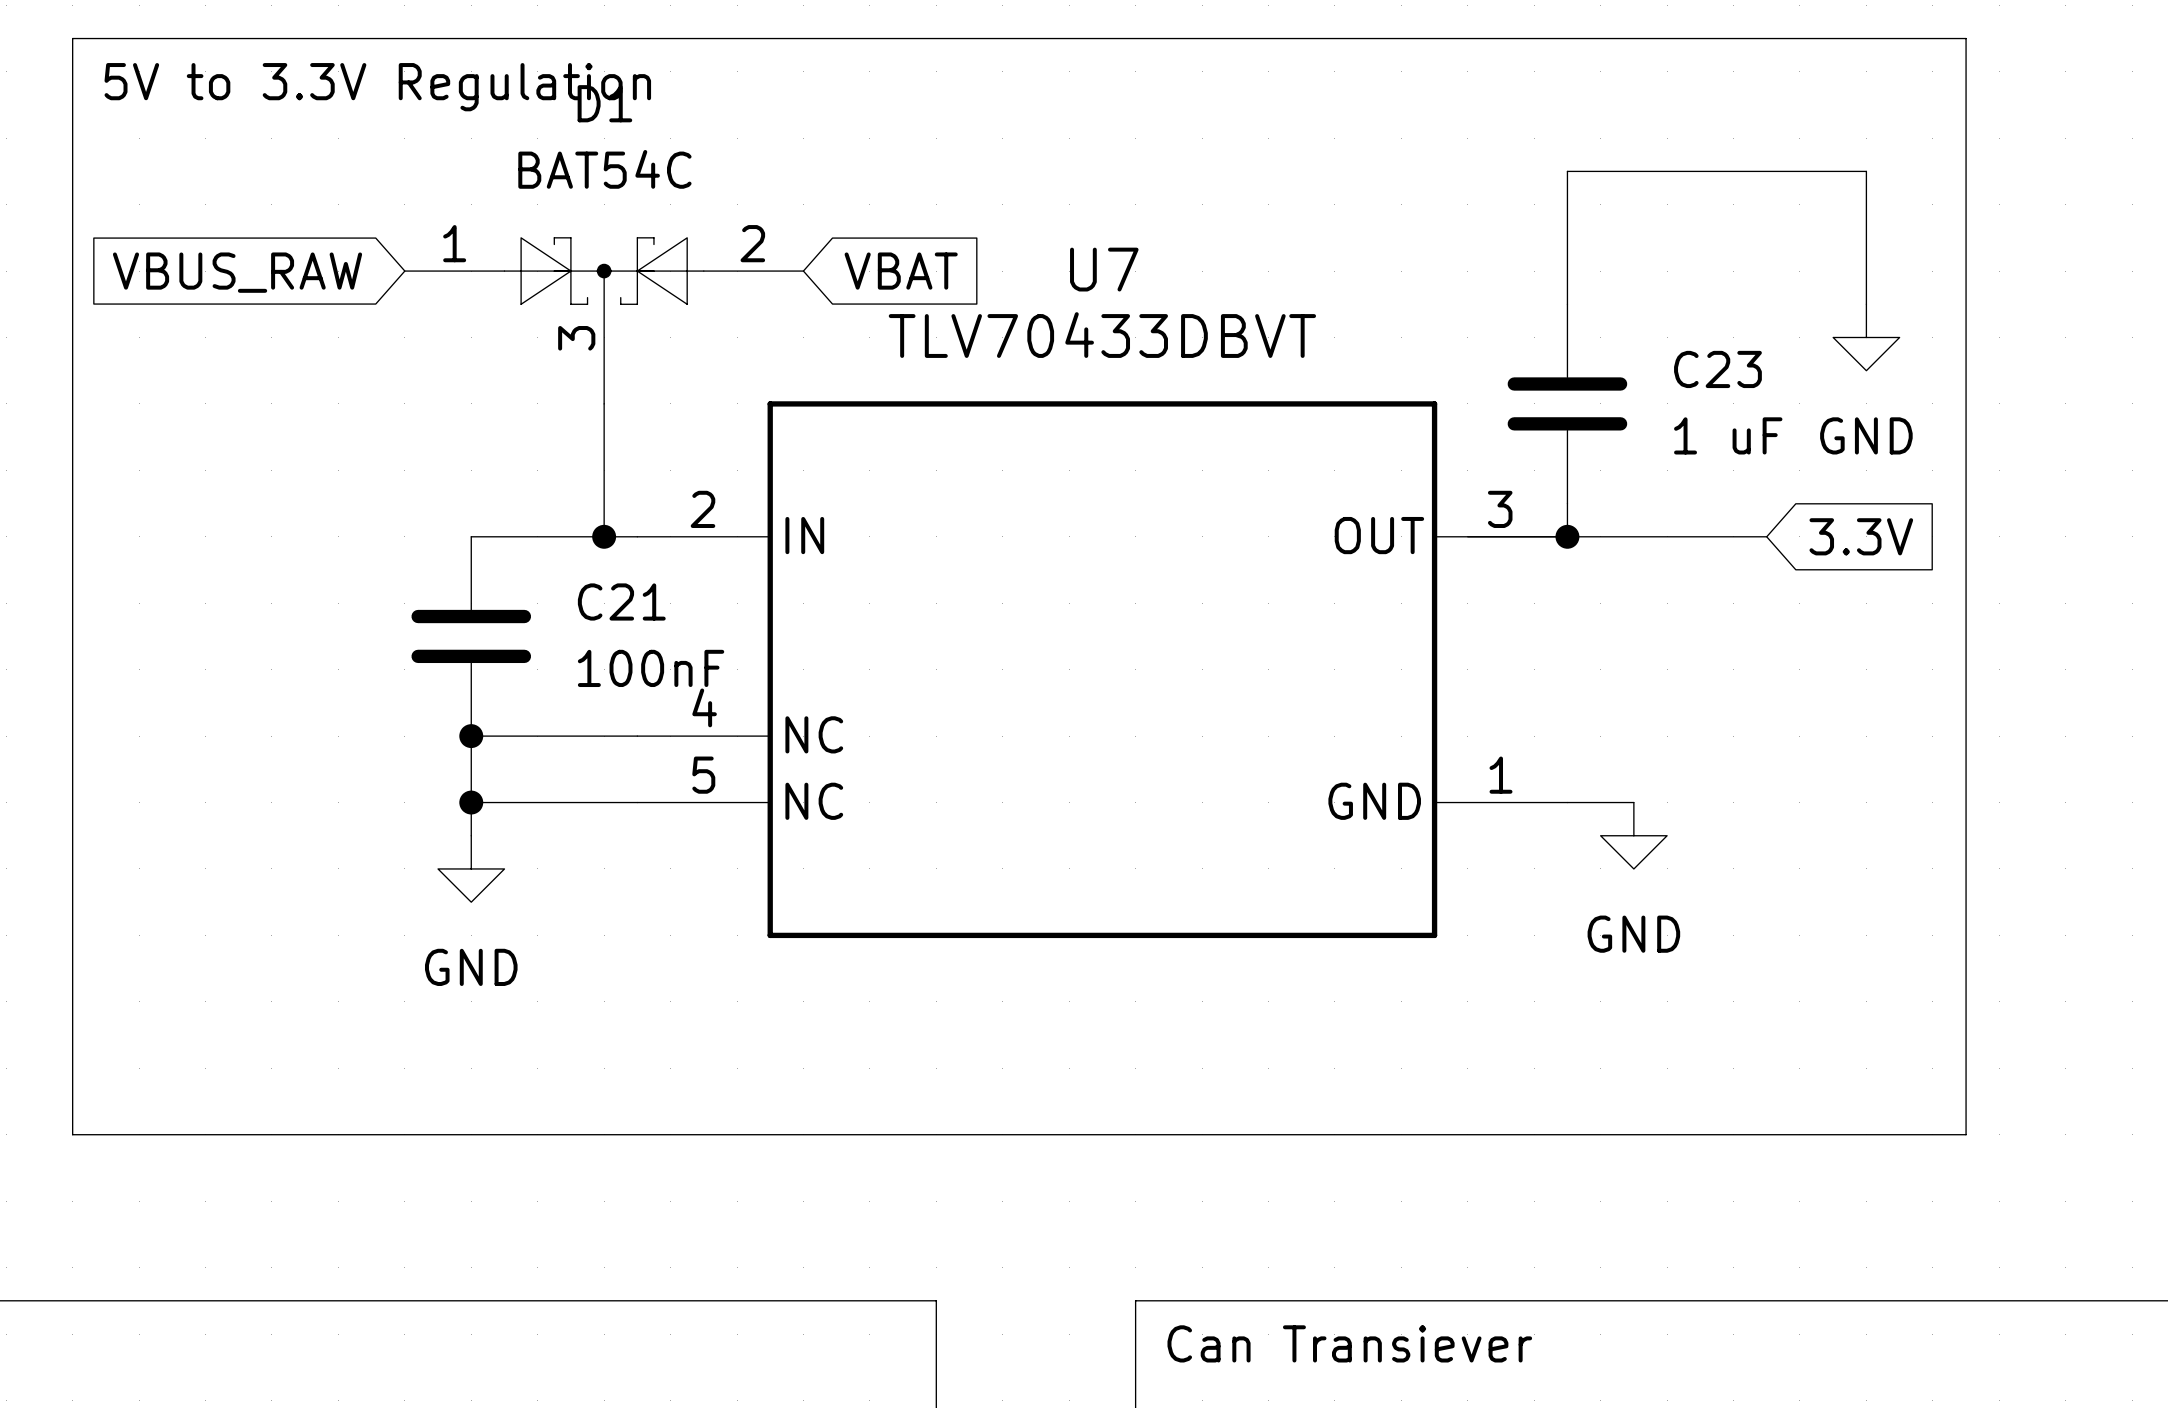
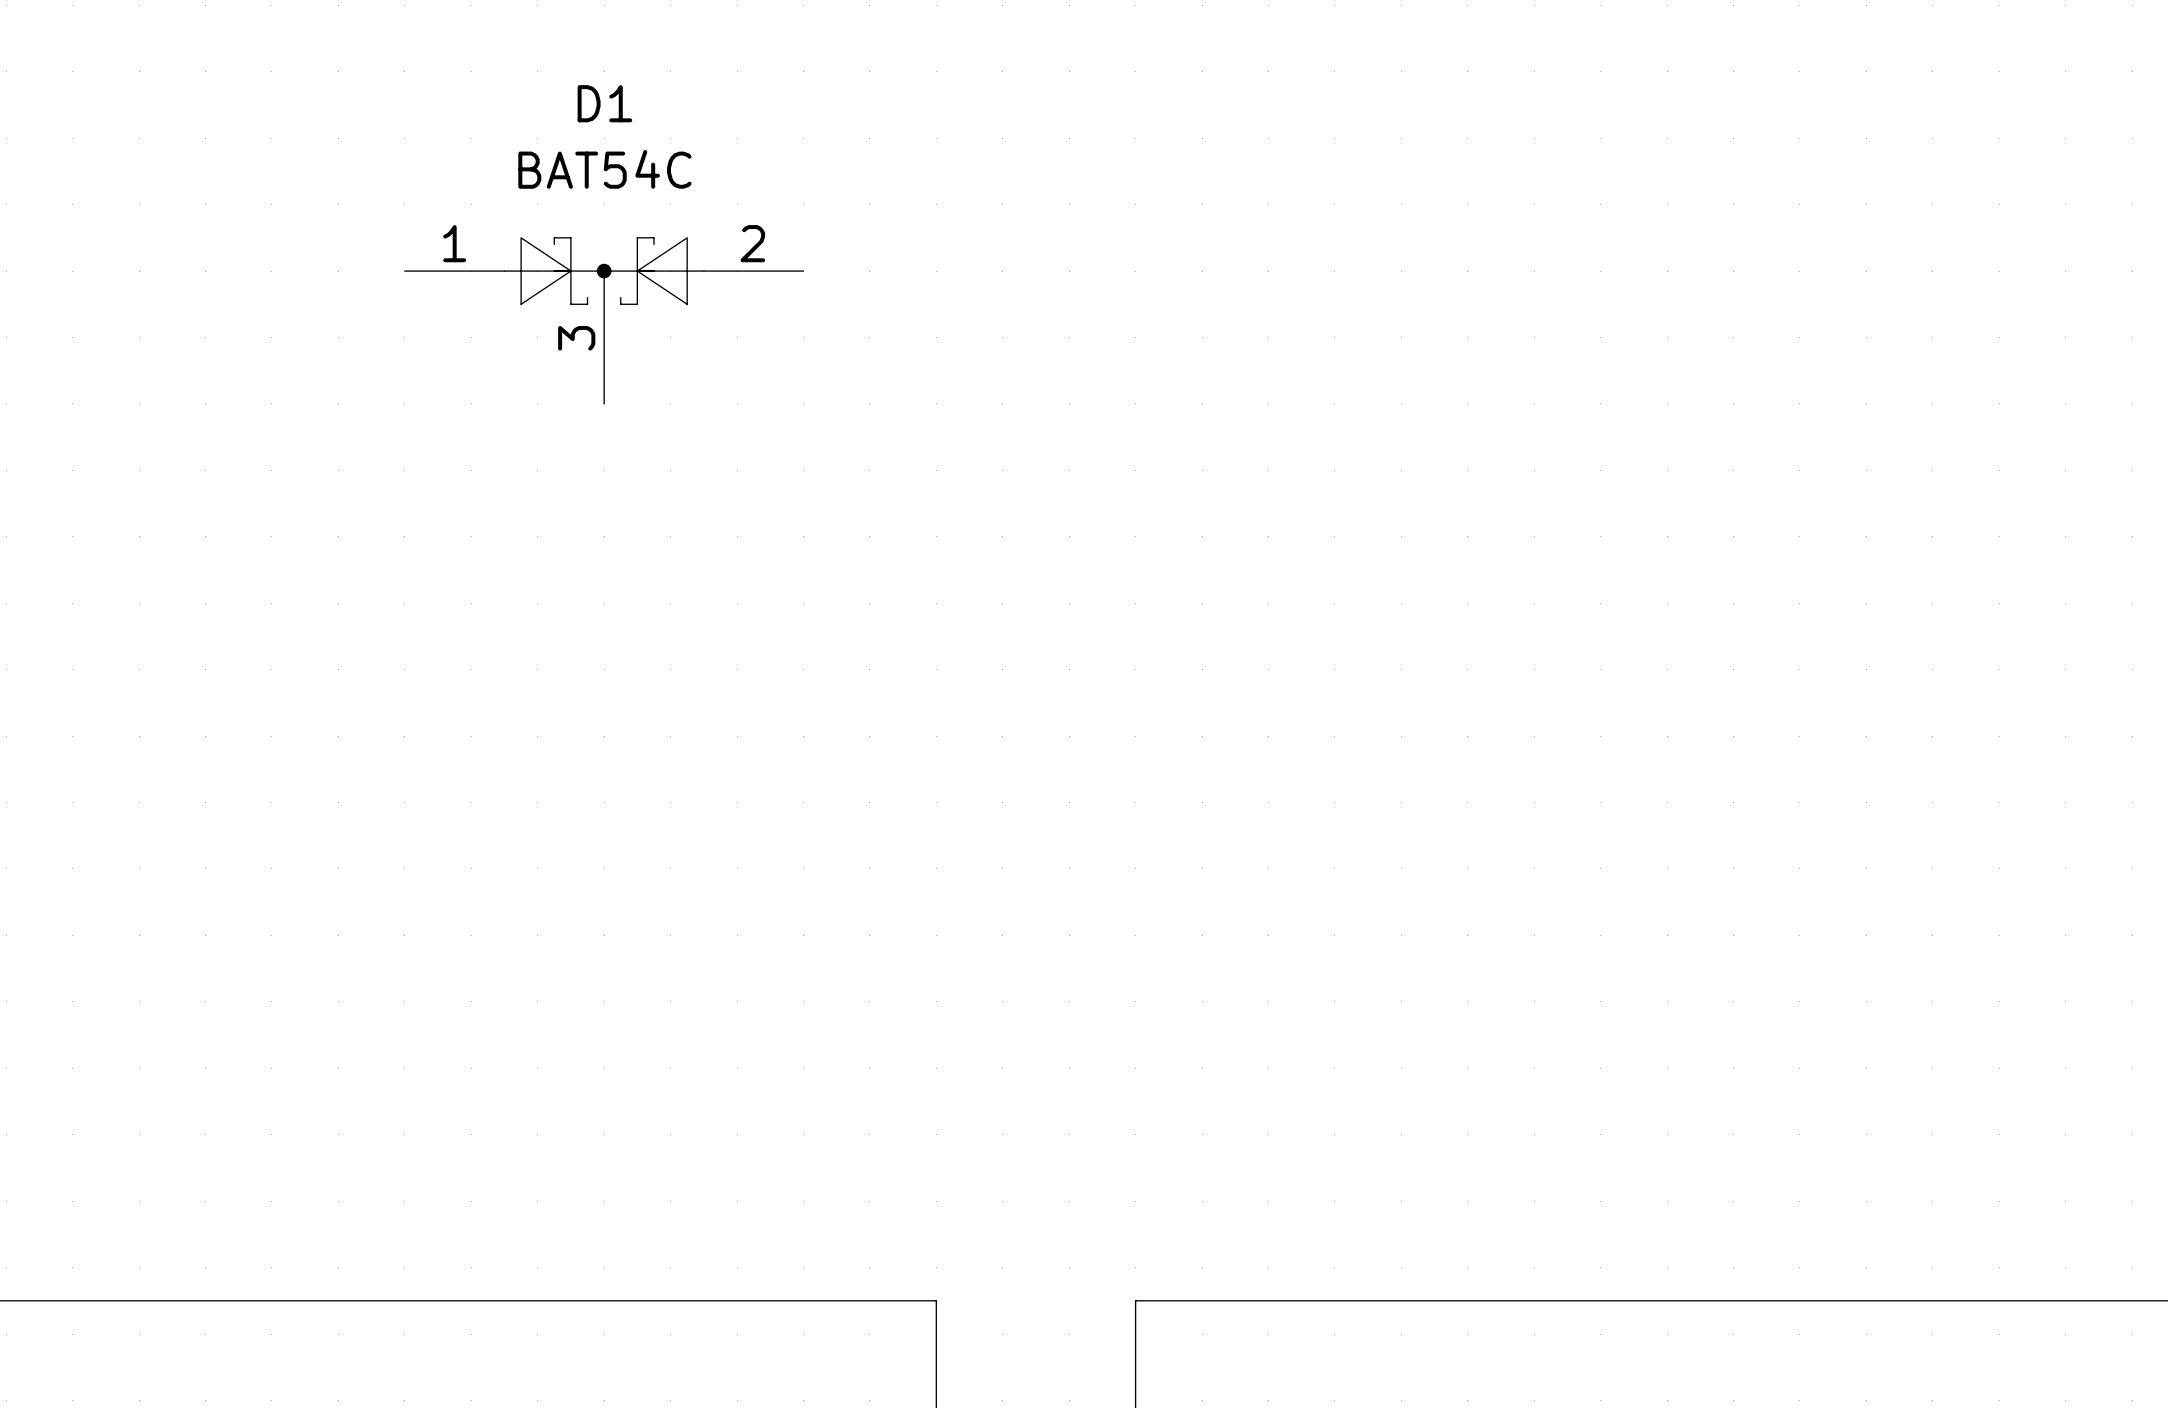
line: (72, 38) (1966, 38) (1966, 1134) (72, 1134) (72, 38) -> none
text: 5V to 3.3V Regulation (377, 87) -> none
global label: VBAT (901, 271) -> none
global label: VBUS_RAW (237, 272) -> none
wire: (1567, 304) (1567, 171) (1866, 171) (1866, 304) -> none
power symbol: GND (1866, 337) -> none
wire: (604, 403) (604, 536) -> none
C23: 1 uF (1567, 403) -> none
wire: (1567, 503) (1567, 536) -> none
wire: (471, 536) (637, 536) -> none
junction: (604, 536) -> none
wire: (1467, 536) (1766, 536) -> none
junction: (1567, 536) -> none
global label: 3.3V (1861, 536) -> none
C21: 100nF (471, 636) -> none
U7: TLV70433DBVT (1102, 669) -> none
junction: (471, 736) -> none
wire: (637, 736) (471, 736) (471, 835) -> none
wire: (471, 802) (637, 802) -> none
junction: (471, 802) -> none
wire: (1567, 802) (1633, 802) -> none
power symbol: GND (1633, 835) -> none
power symbol: GND (471, 868) -> none
text: Can Transiever (1349, 1343) -> none

